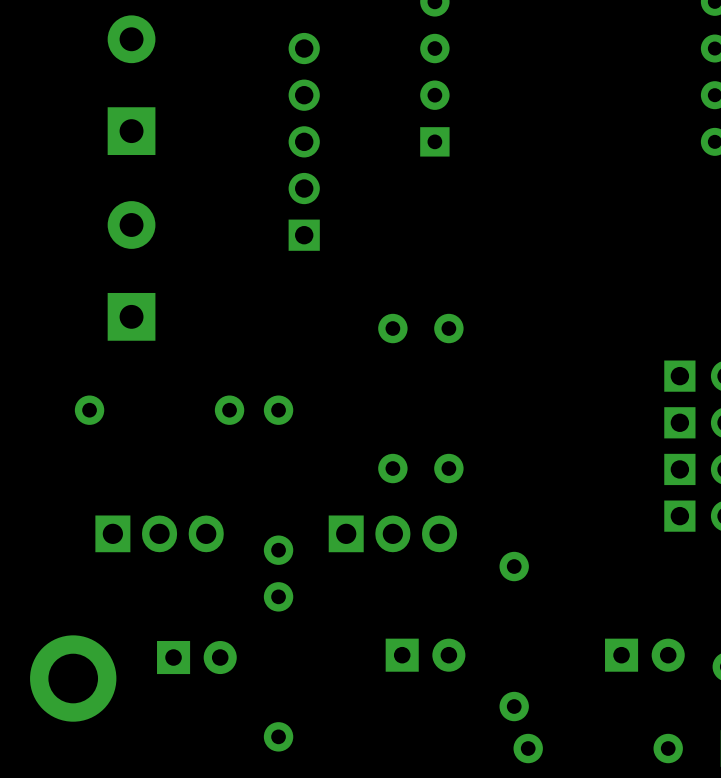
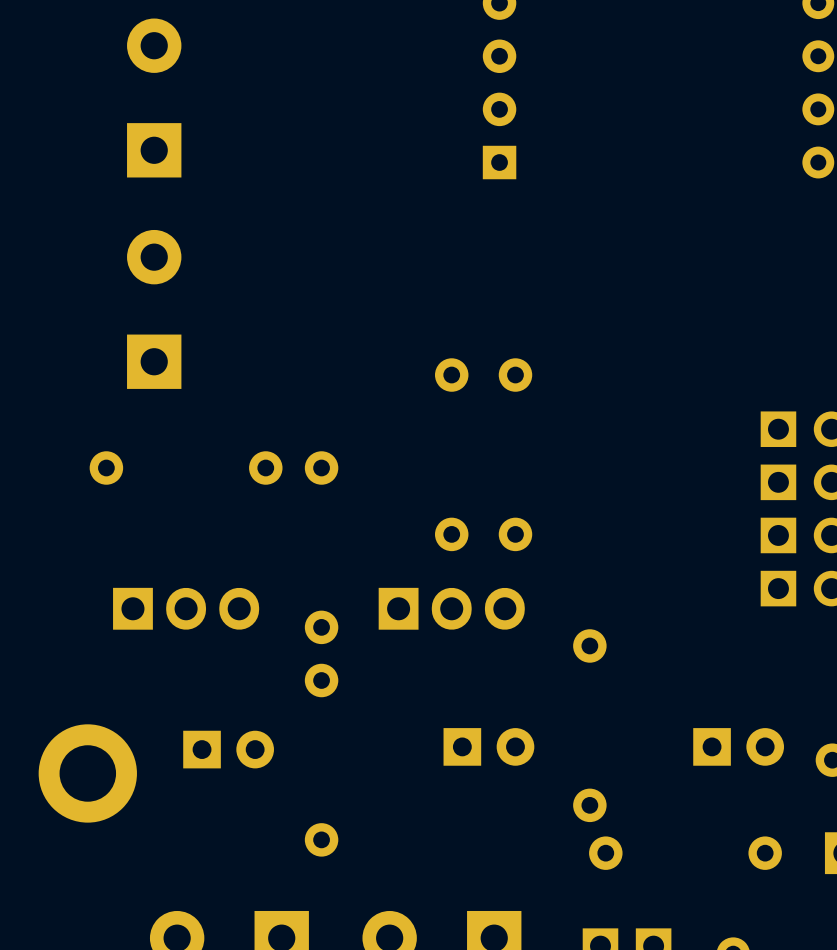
part: (304, 141) -> none

